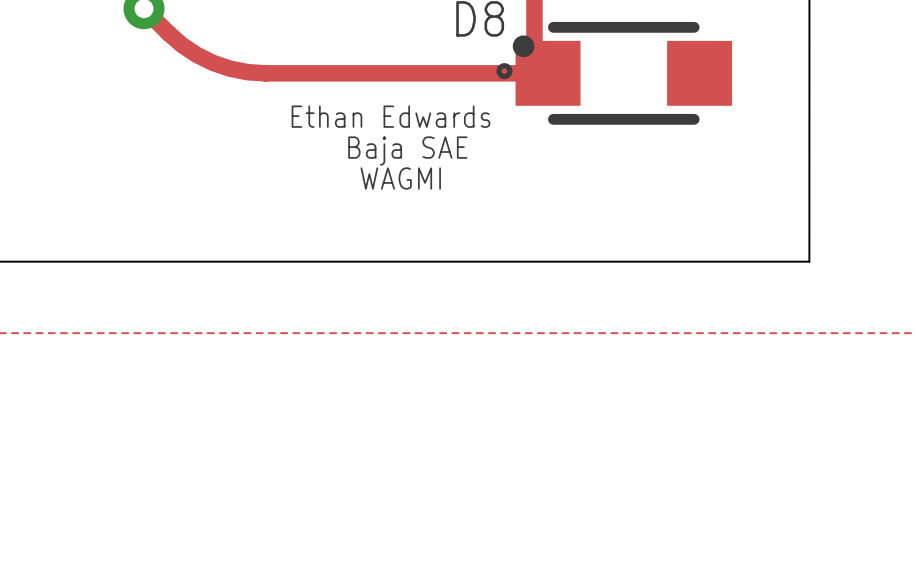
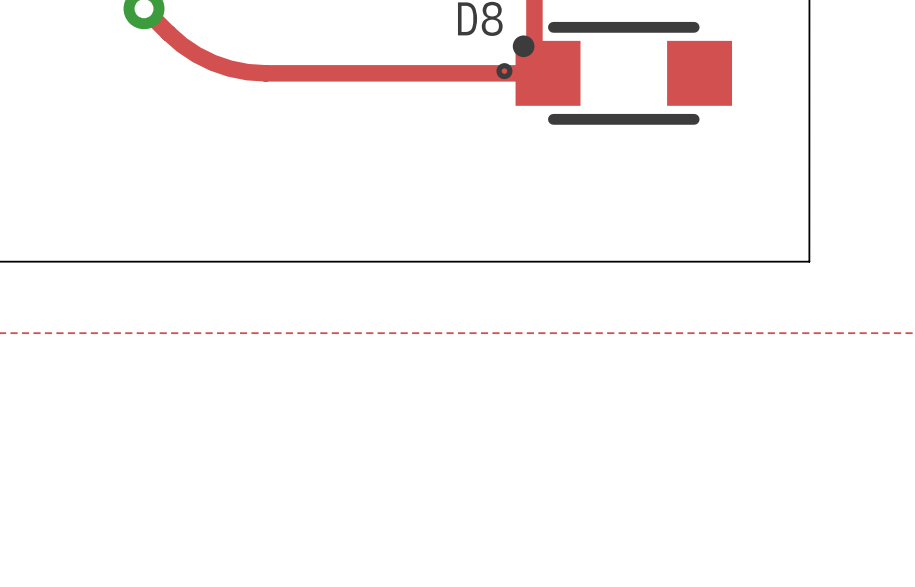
text: Ethan Edwards (391, 116) -> none
text: Baja SAE (407, 151) -> none
text: WAGMI (400, 178) -> none

